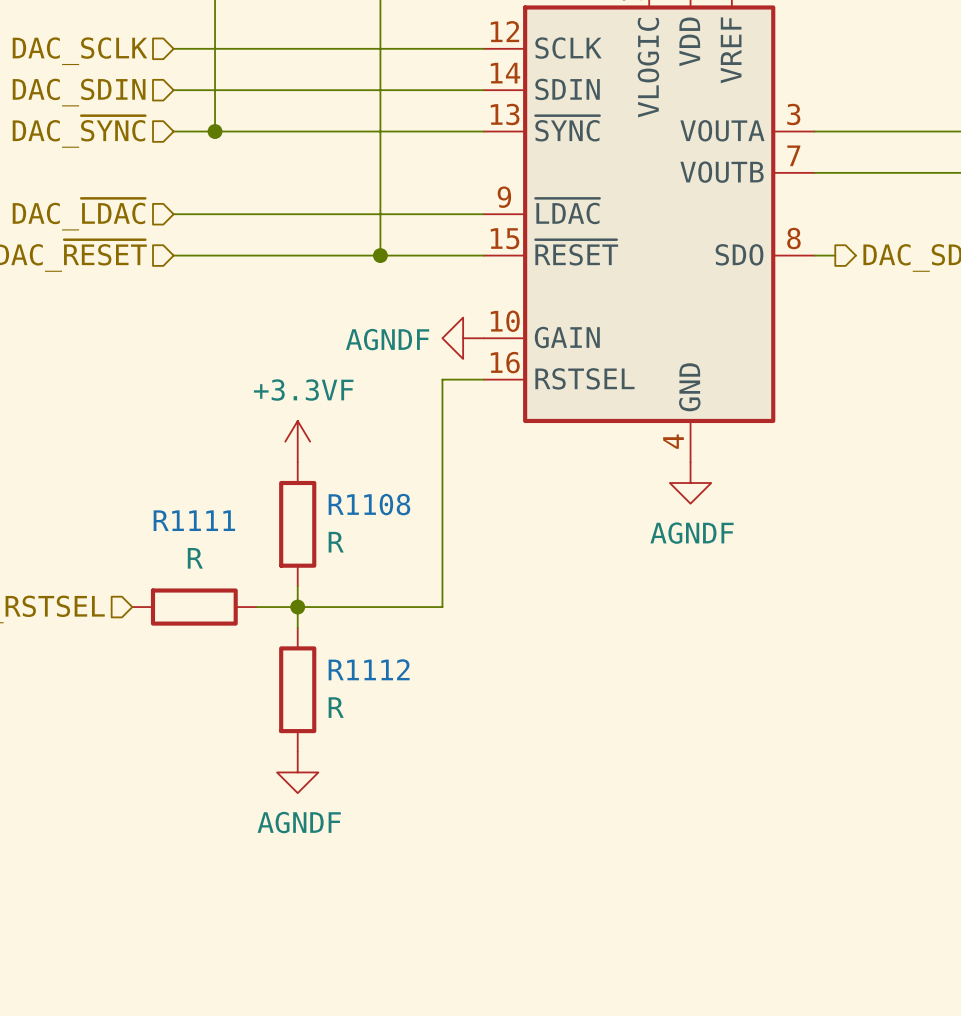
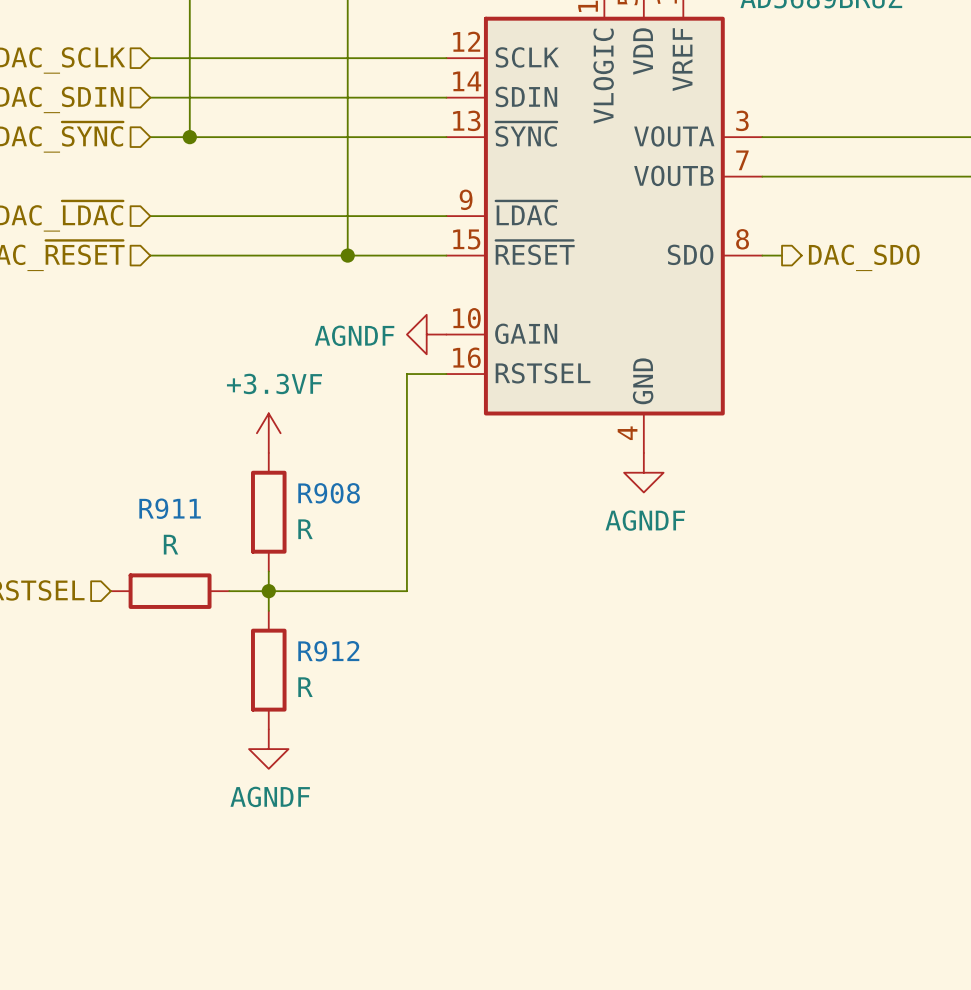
R1108 name: R1108 (369, 504) -> R908 (329, 493)
R1111 name: R1111 (194, 520) -> R911 (170, 508)
R1112 name: R1112 (369, 669) -> R912 (328, 651)

